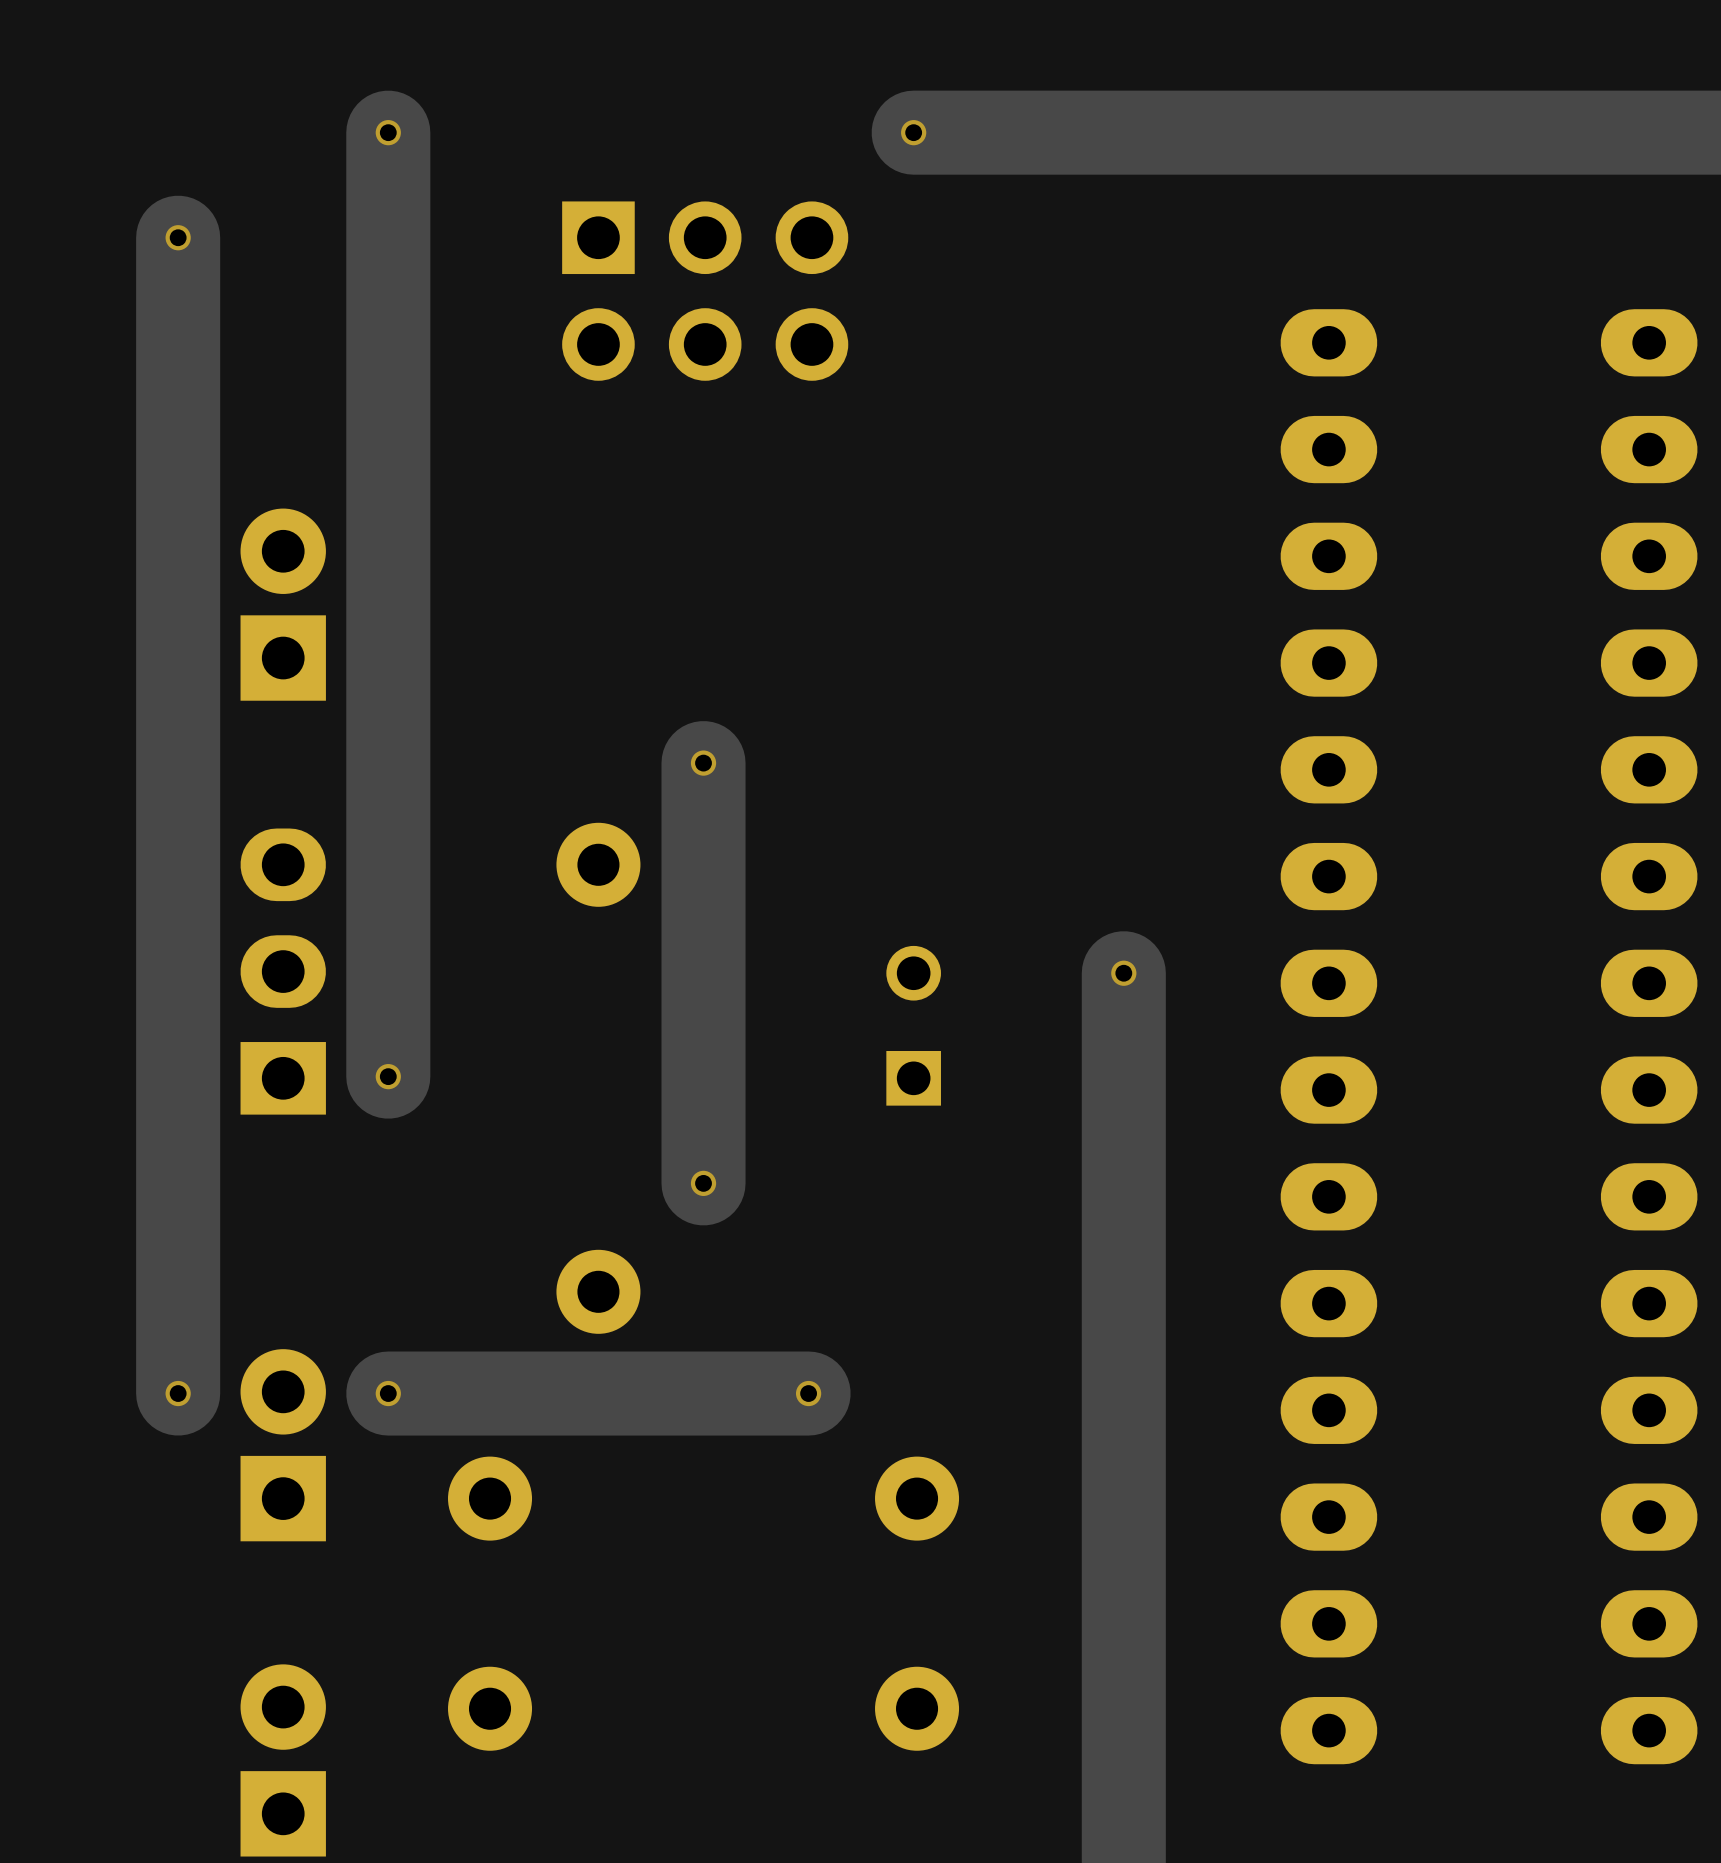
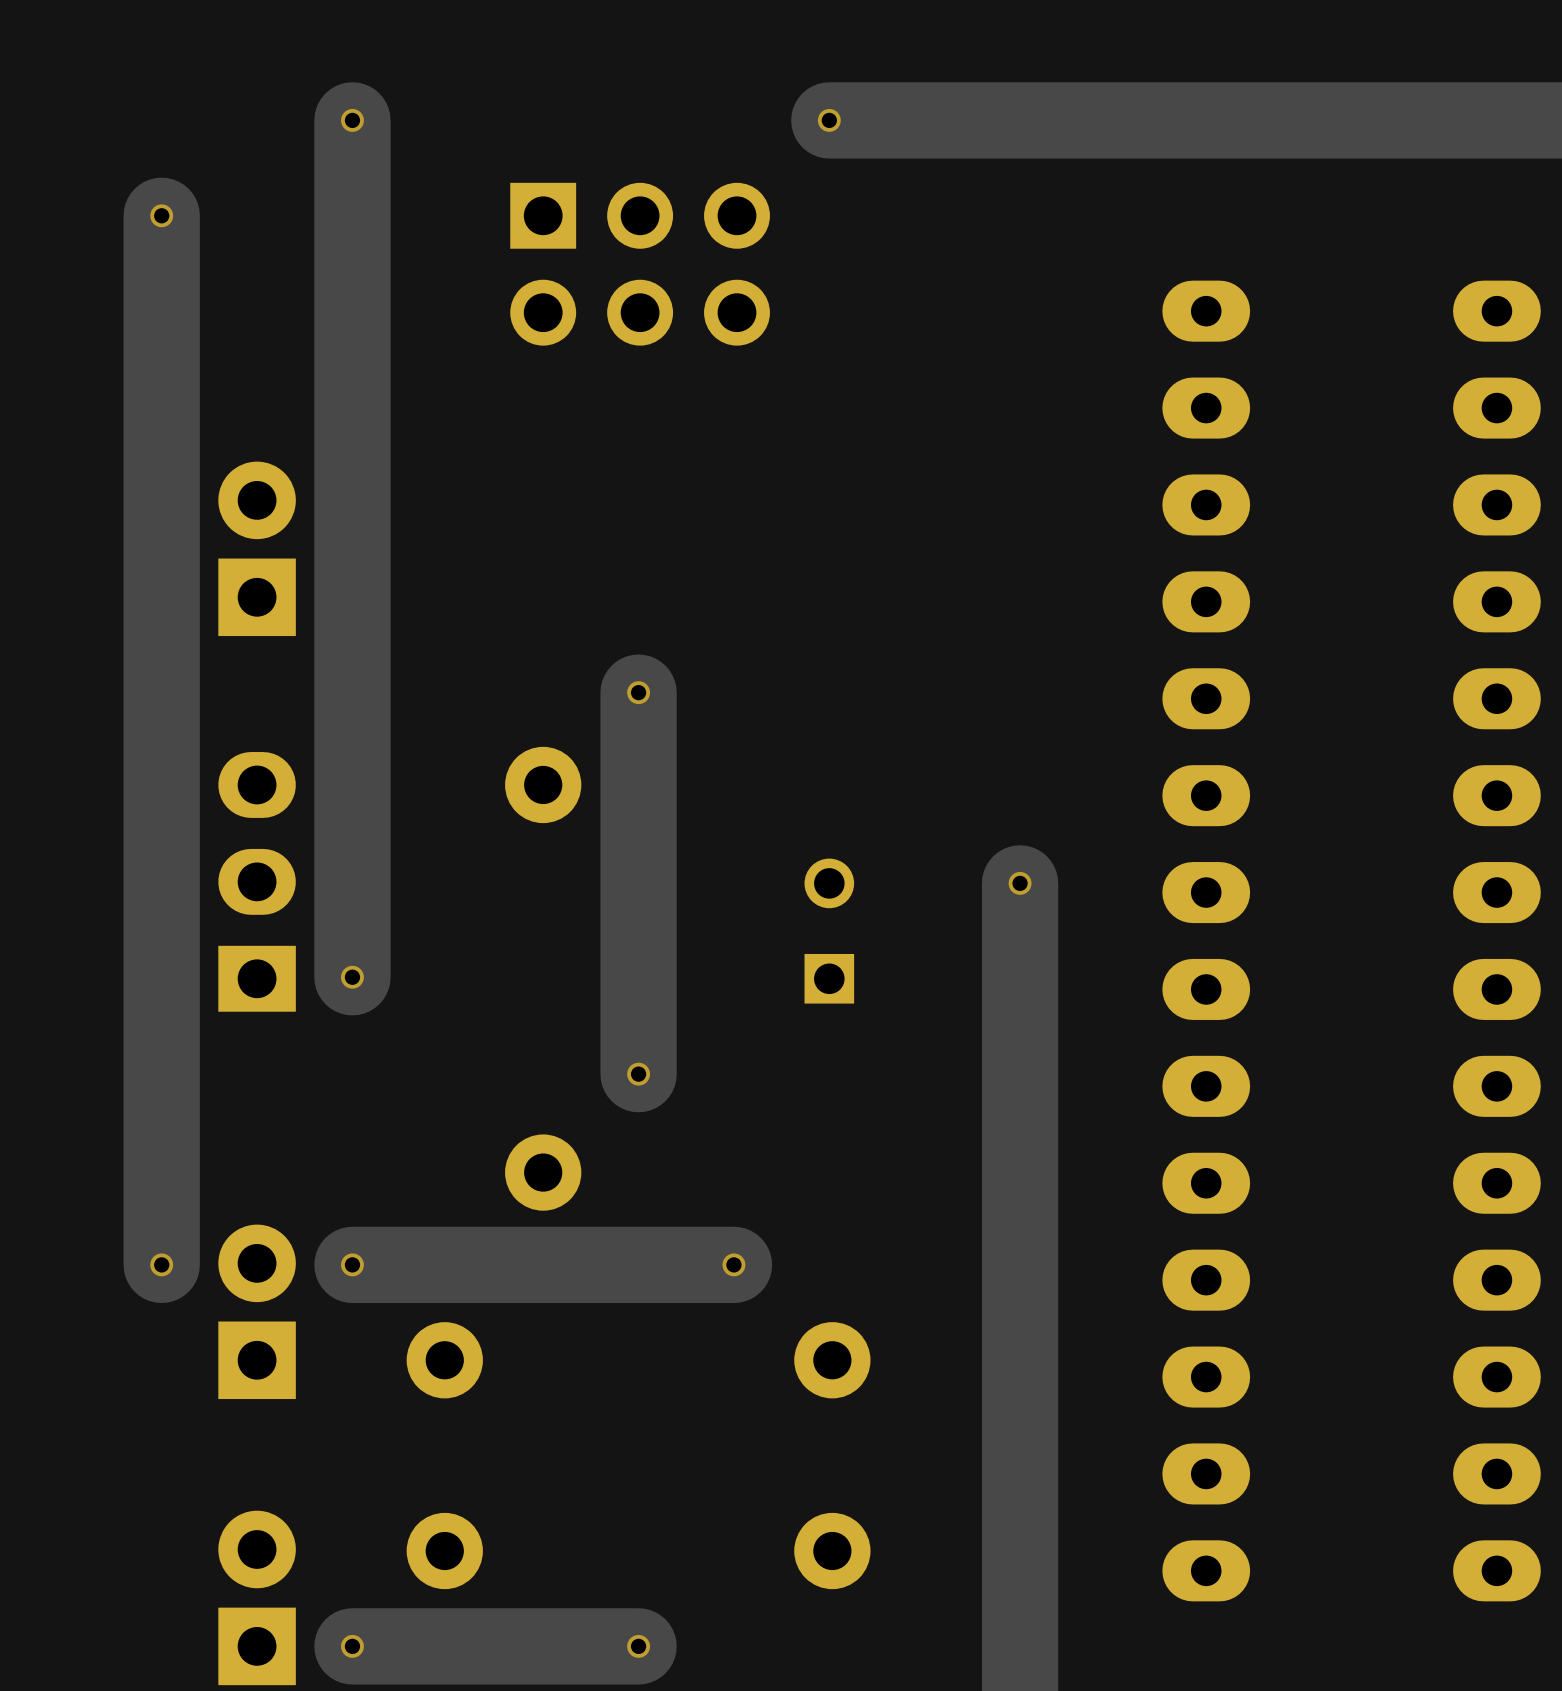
via: none -> (352, 1646)
track: none -> (638, 1646) (352, 1646)
via: none -> (638, 1646)

